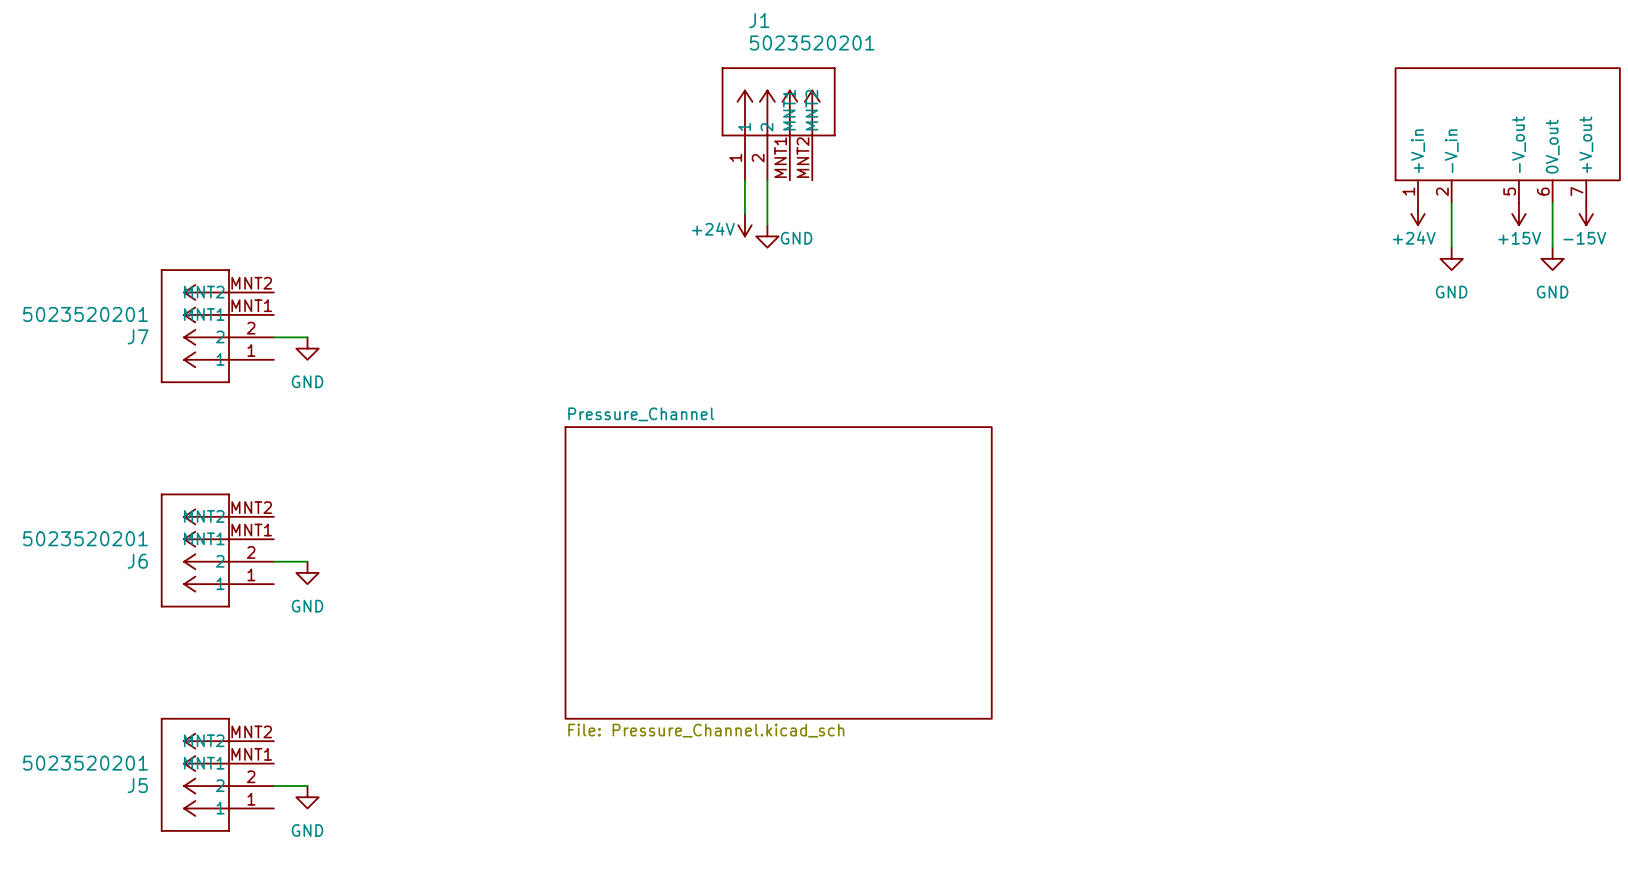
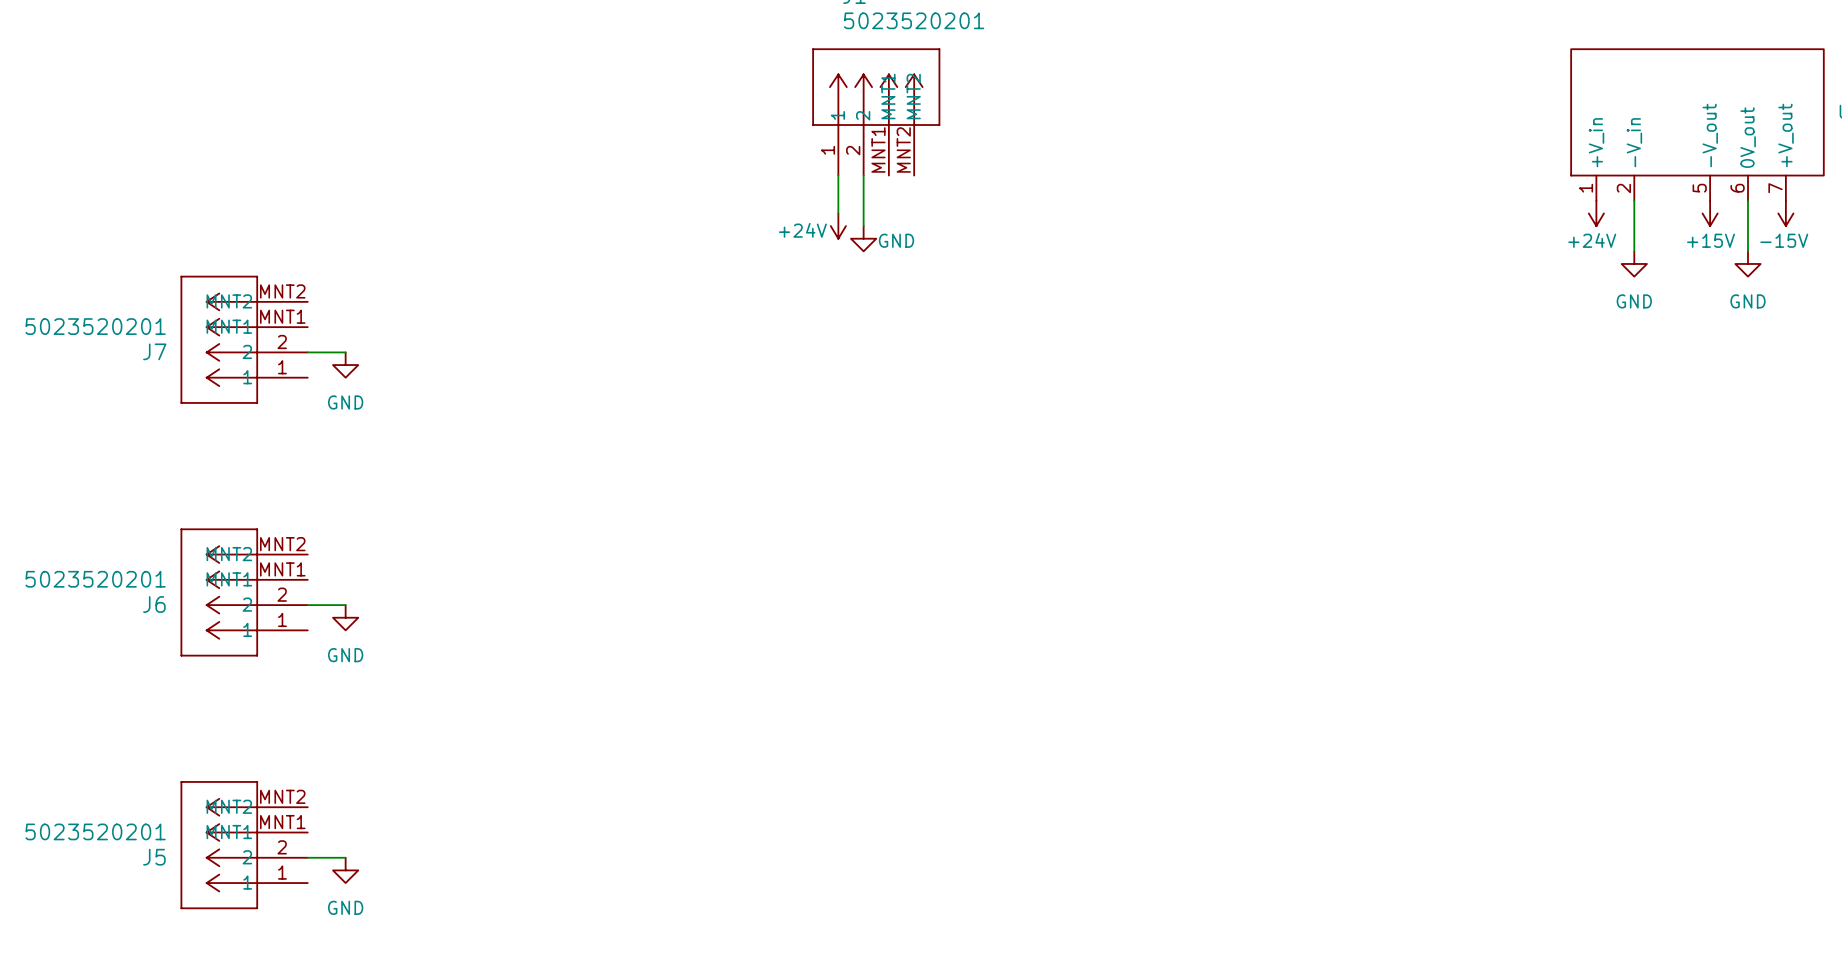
sheet Pressure_Channel: File: Pressure_Channel.kicad_sch (778, 572) -> none

